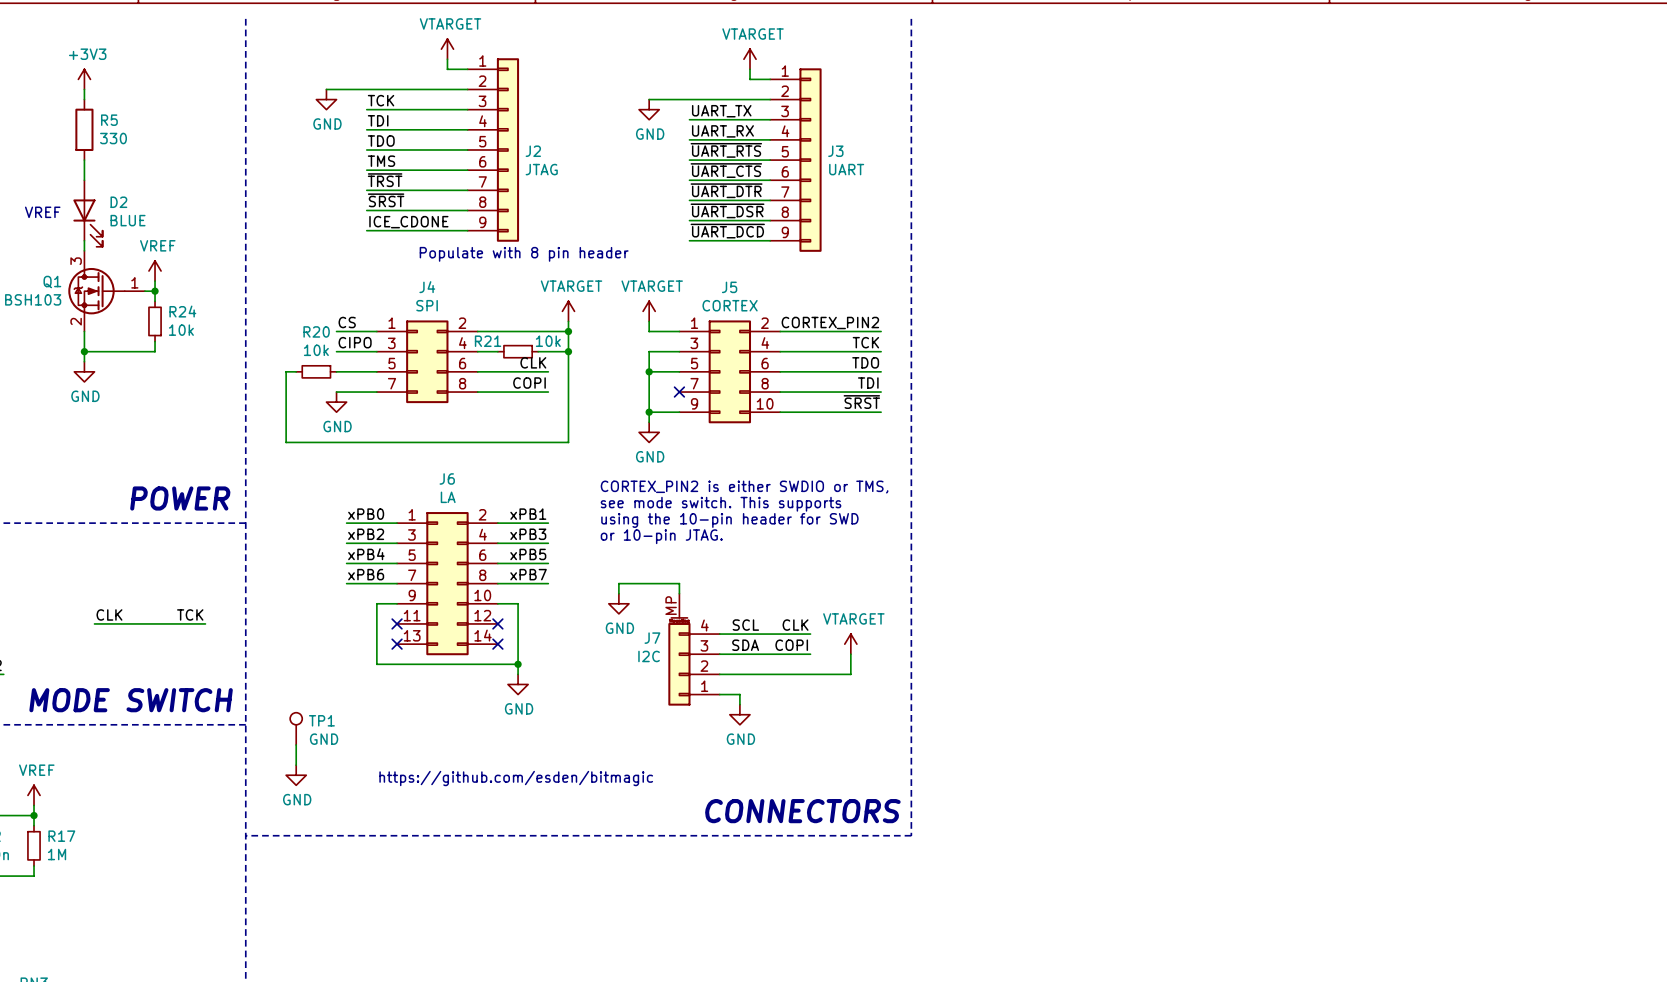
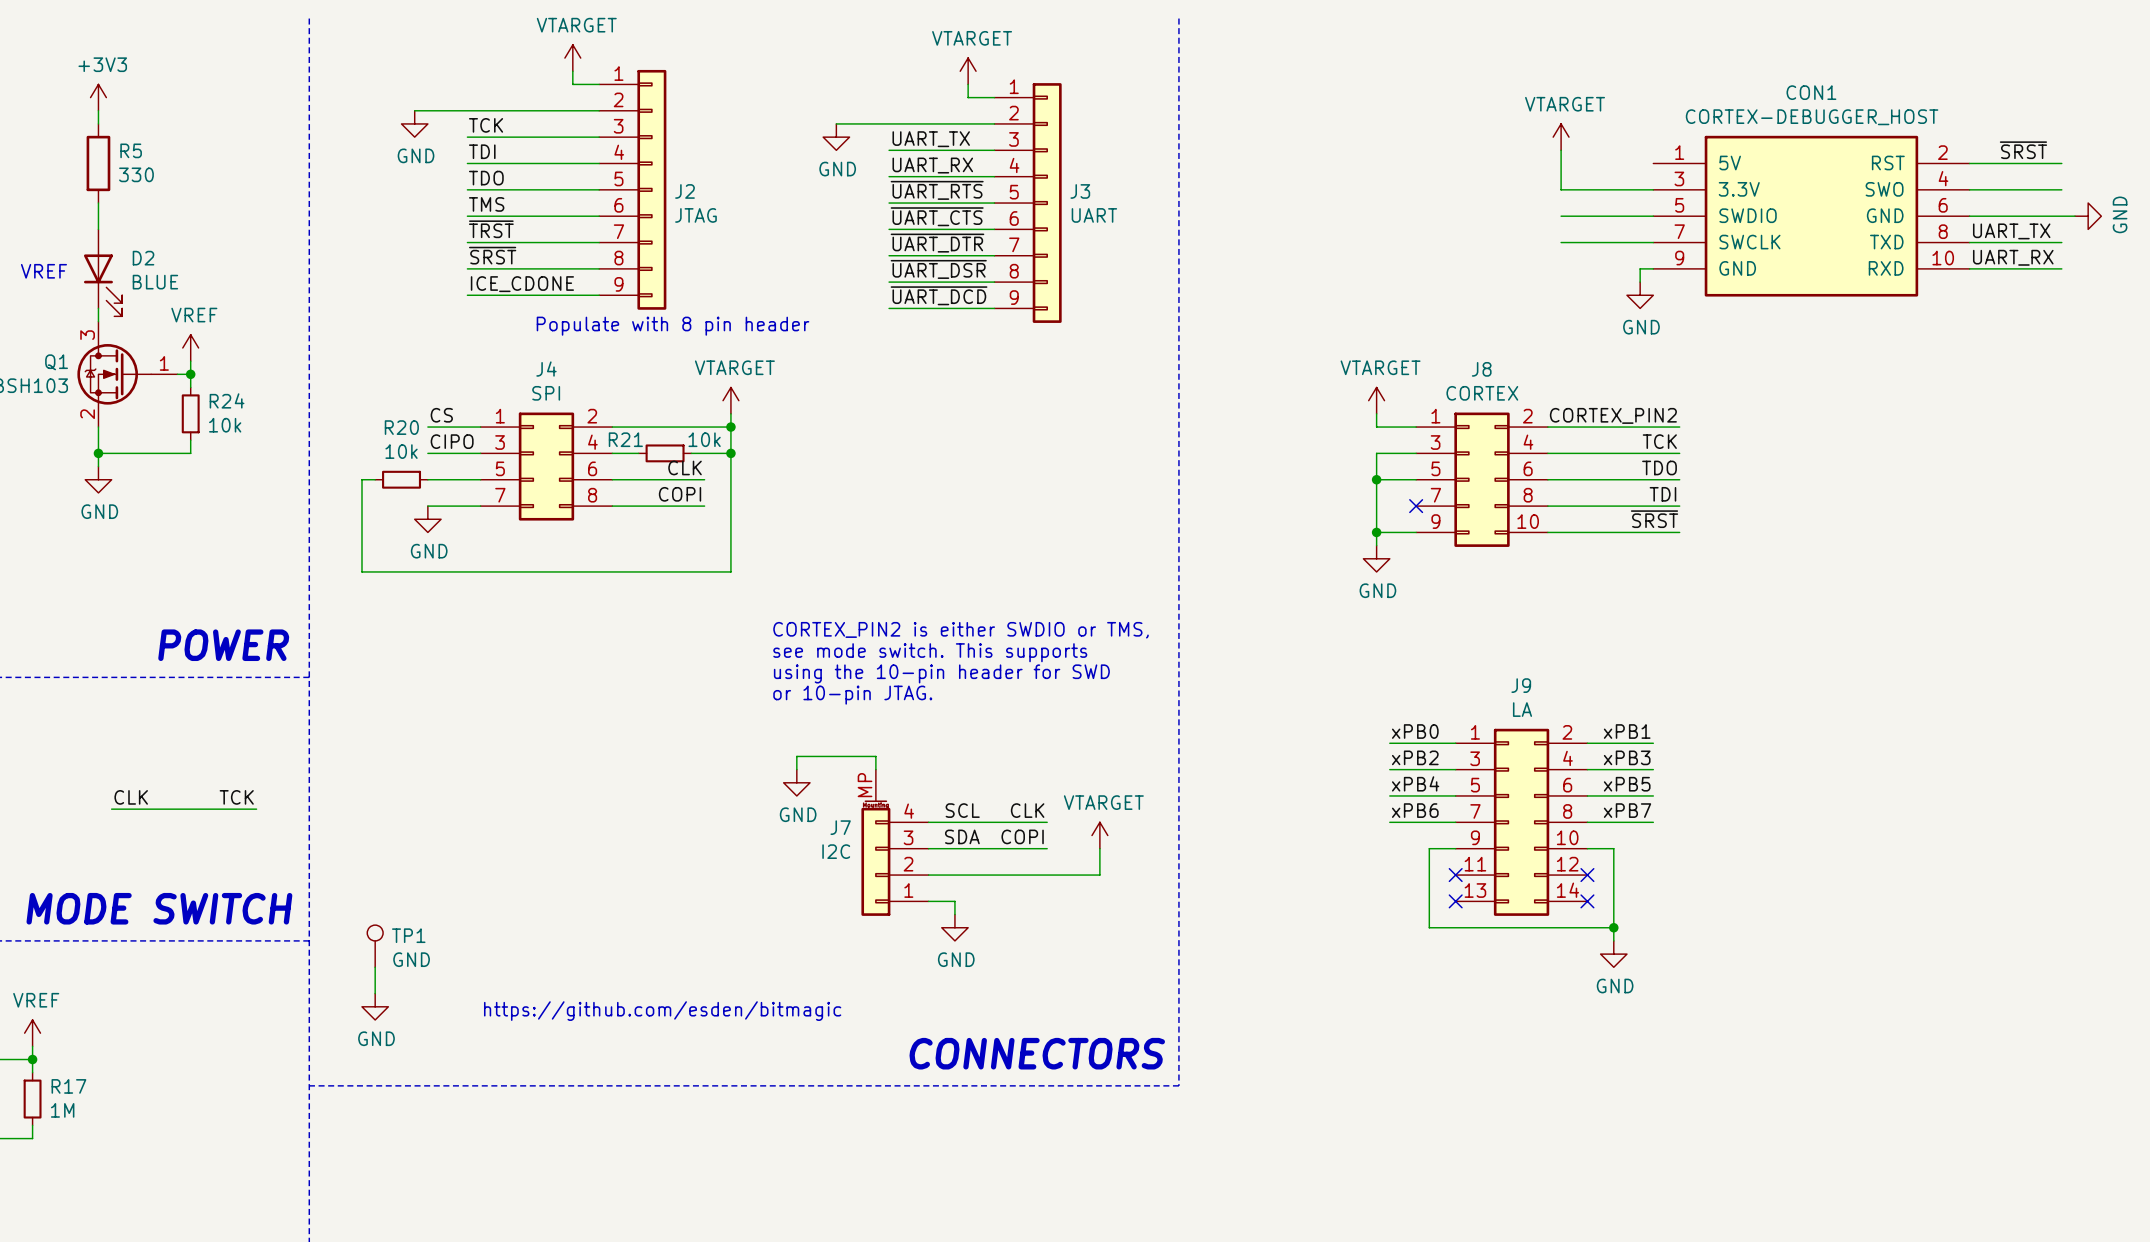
power symbol: none -> VTARGET (1561, 137)
wire: none -> (1561, 150) (1561, 189) (1653, 189)
label: none -> ~{SRST} (2023, 150)
wire: none -> (1969, 163) (2061, 163)
wire: none -> (1969, 189) (2061, 189)
wire: none -> (1561, 216) (1653, 216)
CON1: none -> CORTEX-DEBUGGER_HOST (1811, 216)
wire: none -> (1969, 216) (2074, 216)
power symbol: none -> GND (2088, 216)
label: none -> UART_TX (2011, 231)
wire: none -> (1561, 242) (1653, 242)
wire: none -> (1969, 242) (2061, 242)
label: none -> UART_RX (2013, 257)
wire: none -> (1653, 268) (1640, 268) (1640, 282)
wire: none -> (1969, 268) (2061, 268)
power symbol: none -> GND (1640, 295)
power symbol: VTARGET (649, 311) -> none
power symbol: none -> VTARGET (1376, 400)
wire: (649, 321) (649, 331) (679, 331) -> none
wire: none -> (1376, 413) (1376, 427) (1416, 427)
label: CORTEX_PIN2 (830, 322) -> none
label: none -> CORTEX_PIN2 (1613, 415)
wire: (780, 331) (881, 331) -> none
wire: none -> (1547, 427) (1679, 427)
label: TCK (865, 342) -> none
label: none -> TCK (1659, 441)
wire: (679, 351) (649, 351) (649, 422) -> none
wire: (780, 351) (881, 351) -> none
wire: none -> (1416, 453) (1376, 453) (1376, 545)
wire: none -> (1547, 453) (1679, 453)
label: TDO (865, 362) -> none
label: none -> TDO (1659, 467)
wire: (649, 371) (679, 371) -> none
junction: (649, 371) -> none
J5: CORTEX (729, 371) -> none
wire: (780, 371) (881, 371) -> none
wire: none -> (1376, 479) (1416, 479)
junction: none -> (1376, 479)
J8: none -> CORTEX (1482, 479)
wire: none -> (1547, 479) (1679, 479)
label: TDI (868, 383) -> none
label: none -> TDI (1662, 494)
no-connect mark: (679, 392) -> none
wire: (780, 392) (881, 392) -> none
no-connect mark: none -> (1416, 506)
wire: none -> (1547, 506) (1679, 506)
label: ~{SRST} (861, 402) -> none
label: none -> ~{SRST} (1654, 519)
wire: (649, 412) (679, 412) -> none
junction: (649, 412) -> none
wire: (780, 412) (881, 412) -> none
wire: none -> (1376, 532) (1416, 532)
junction: none -> (1376, 532)
wire: none -> (1547, 532) (1679, 532)
power symbol: GND (649, 432) -> none
power symbol: none -> GND (1376, 558)
label: xPB0 (366, 514) -> none
label: xPB1 (528, 514) -> none
wire: (346, 523) (397, 523) -> none
wire: (497, 523) (548, 523) -> none
label: xPB2 (366, 534) -> none
label: xPB3 (528, 534) -> none
wire: (346, 543) (397, 543) -> none
wire: (497, 543) (548, 543) -> none
label: xPB4 (366, 554) -> none
label: xPB5 (528, 554) -> none
wire: (346, 563) (397, 563) -> none
wire: (497, 563) (548, 563) -> none
label: none -> xPB0 (1415, 731)
label: none -> xPB1 (1627, 731)
wire: none -> (1389, 743) (1455, 743)
wire: none -> (1587, 743) (1653, 743)
label: xPB6 (366, 574) -> none
label: xPB7 (528, 574) -> none
wire: (346, 583) (397, 583) -> none
J6: LA (447, 583) -> none
wire: (497, 583) (548, 583) -> none
label: none -> xPB2 (1415, 757)
label: none -> xPB3 (1627, 757)
wire: none -> (1389, 769) (1455, 769)
wire: none -> (1587, 769) (1653, 769)
wire: (397, 603) (376, 603) (376, 664) (518, 664) -> none
wire: (497, 603) (518, 603) (518, 674) -> none
label: none -> xPB4 (1415, 783)
label: none -> xPB5 (1627, 784)
wire: none -> (1389, 795) (1455, 795)
wire: none -> (1587, 795) (1653, 795)
no-connect mark: (397, 623) -> none
no-connect mark: (497, 623) -> none
label: none -> xPB6 (1415, 810)
label: none -> xPB7 (1627, 810)
wire: none -> (1389, 822) (1455, 822)
J9: none -> LA (1521, 822)
wire: none -> (1587, 822) (1653, 822)
no-connect mark: (397, 644) -> none
no-connect mark: (497, 644) -> none
wire: none -> (1455, 848) (1429, 848) (1429, 927) (1613, 927)
wire: none -> (1587, 848) (1613, 848) (1613, 940)
junction: (518, 664) -> none
no-connect mark: none -> (1455, 875)
no-connect mark: none -> (1587, 875)
power symbol: GND (518, 684) -> none
no-connect mark: none -> (1455, 901)
no-connect mark: none -> (1587, 901)
junction: none -> (1613, 927)
power symbol: none -> GND (1613, 954)

